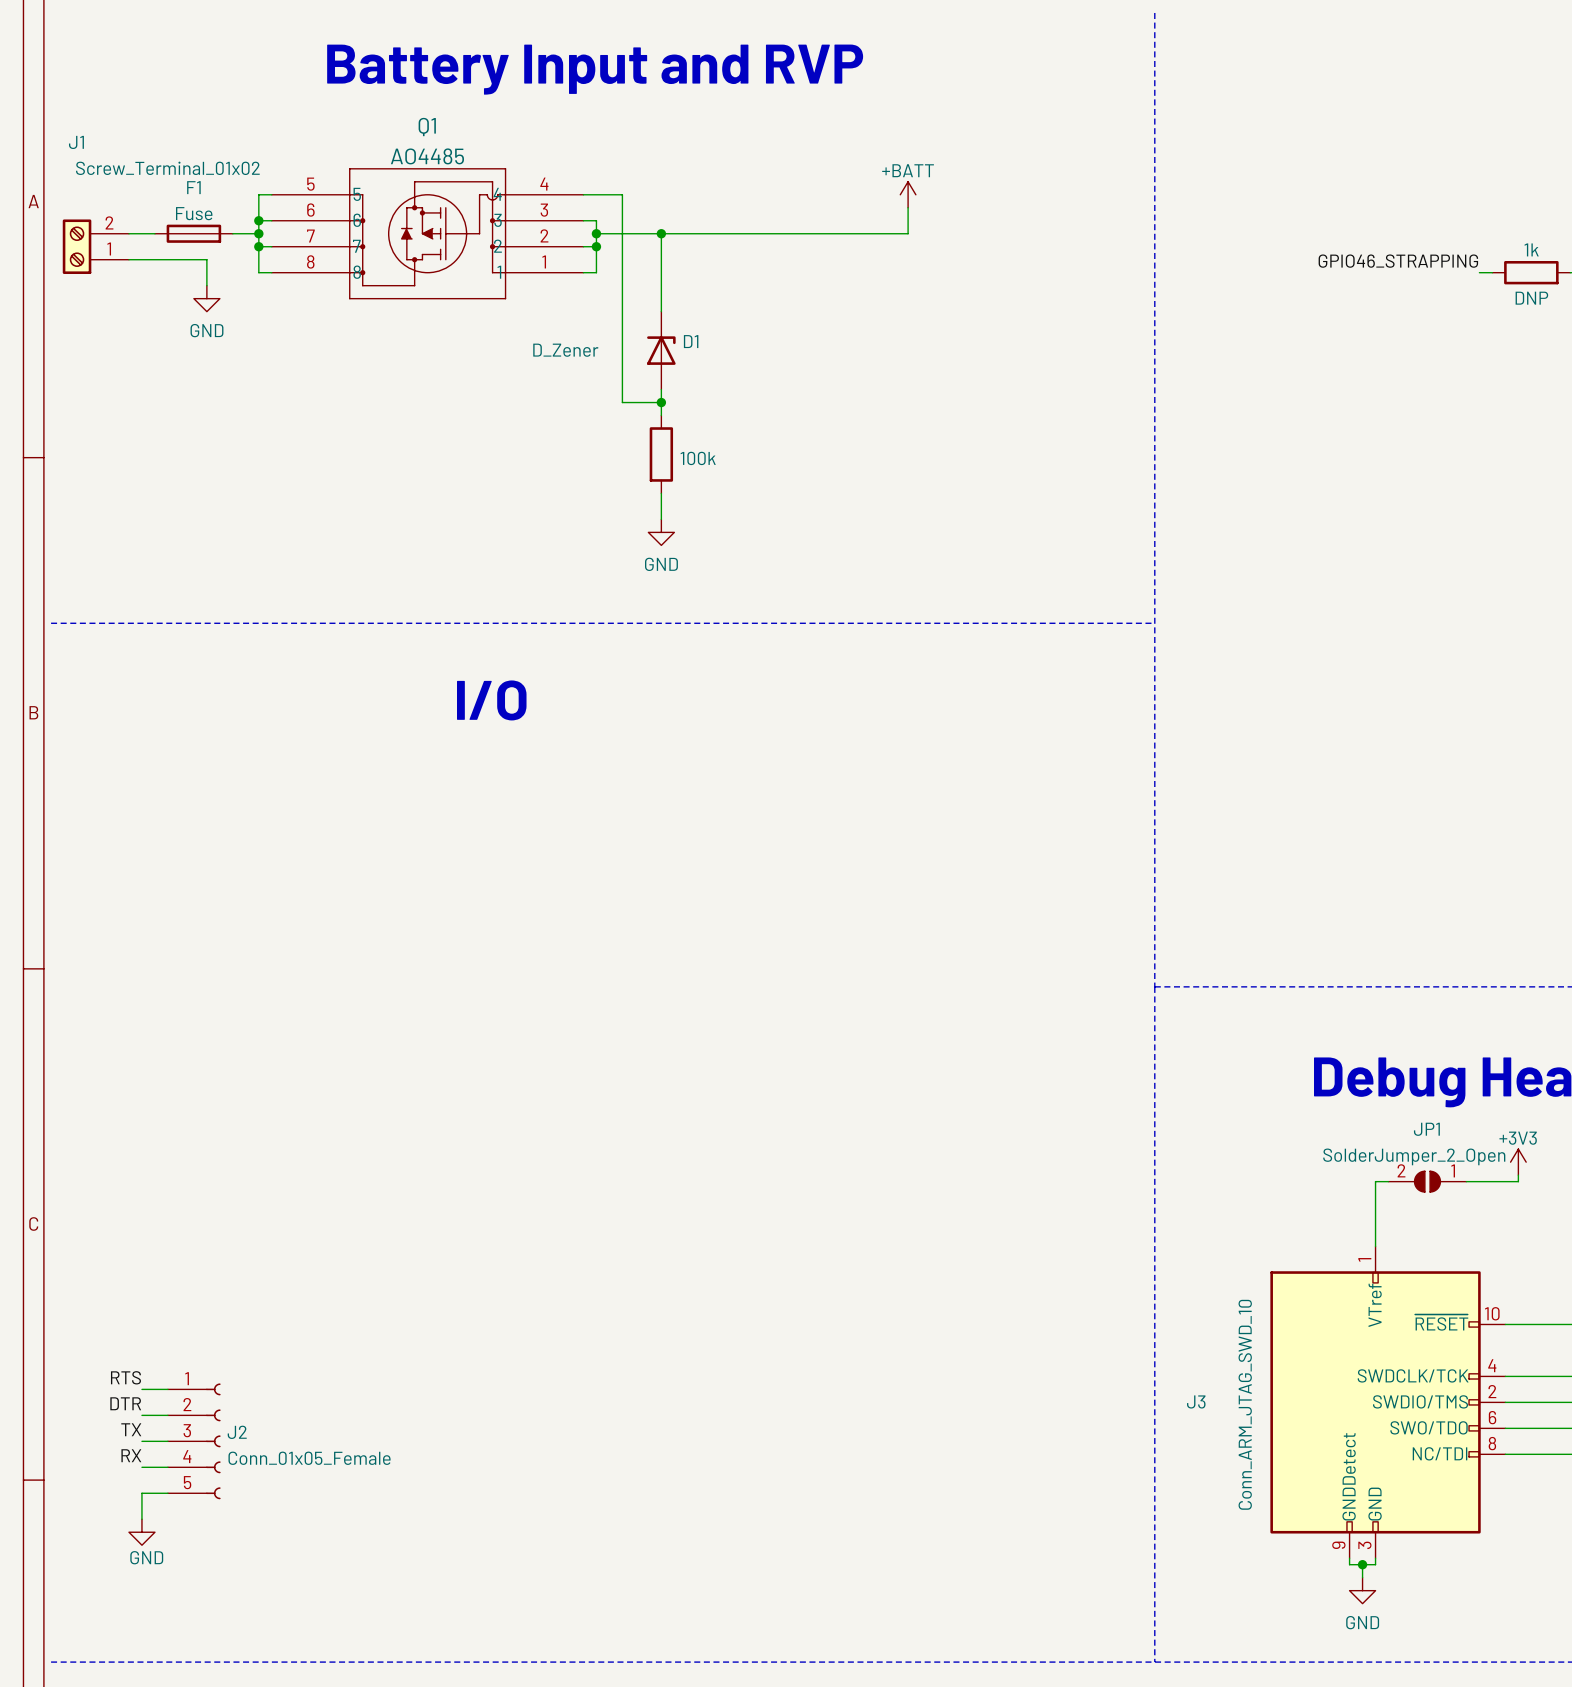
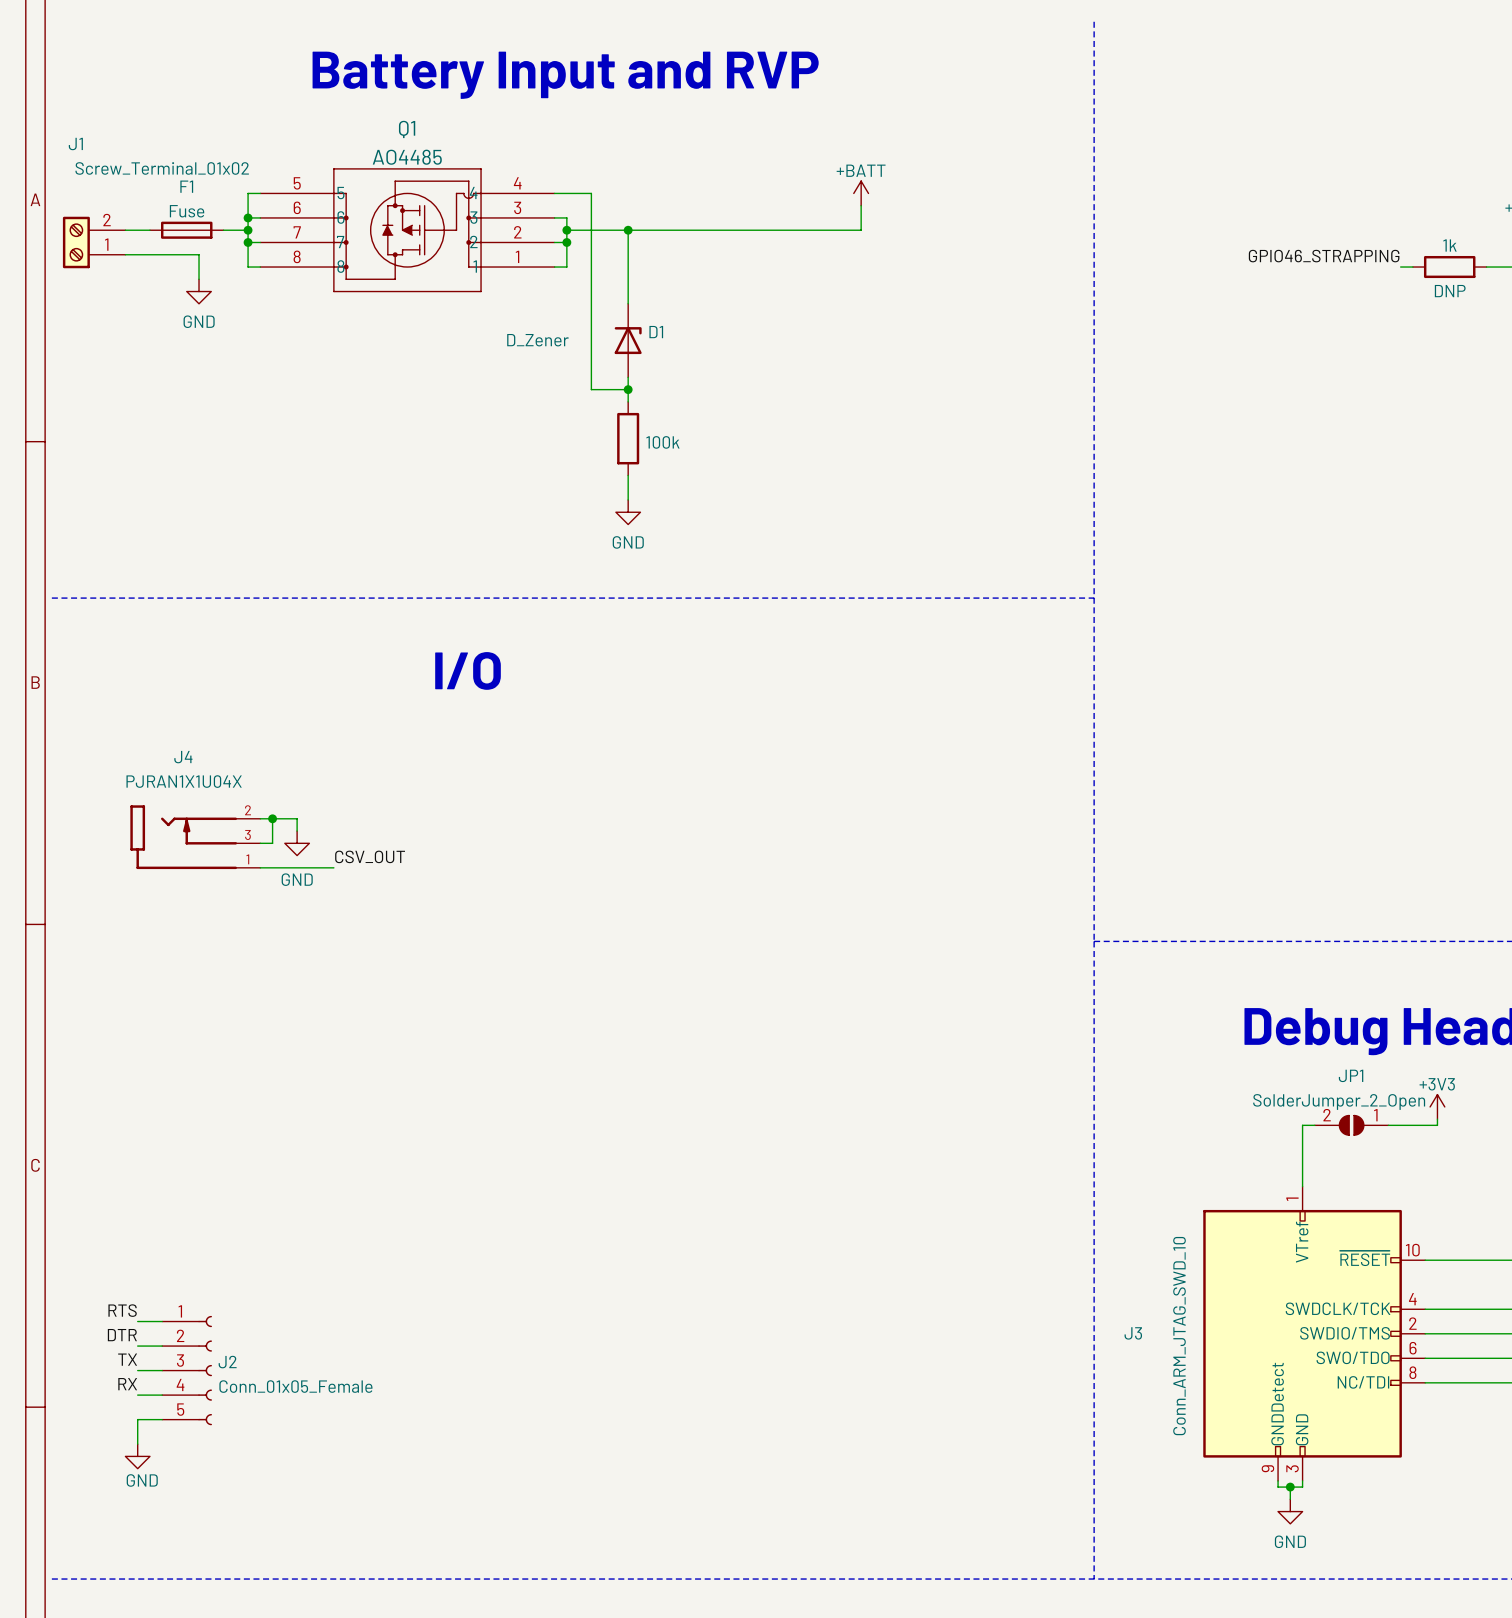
wire: none -> (260, 818) (297, 818) (297, 831)
wire: none -> (272, 818) (272, 843) (260, 843)
junction: none -> (272, 818)
J4: none -> PJRAN1X1U04X (195, 837)
power symbol: none -> GND (297, 843)
label: none -> CSV_OUT (370, 856)
wire: none -> (260, 867) (333, 867)

